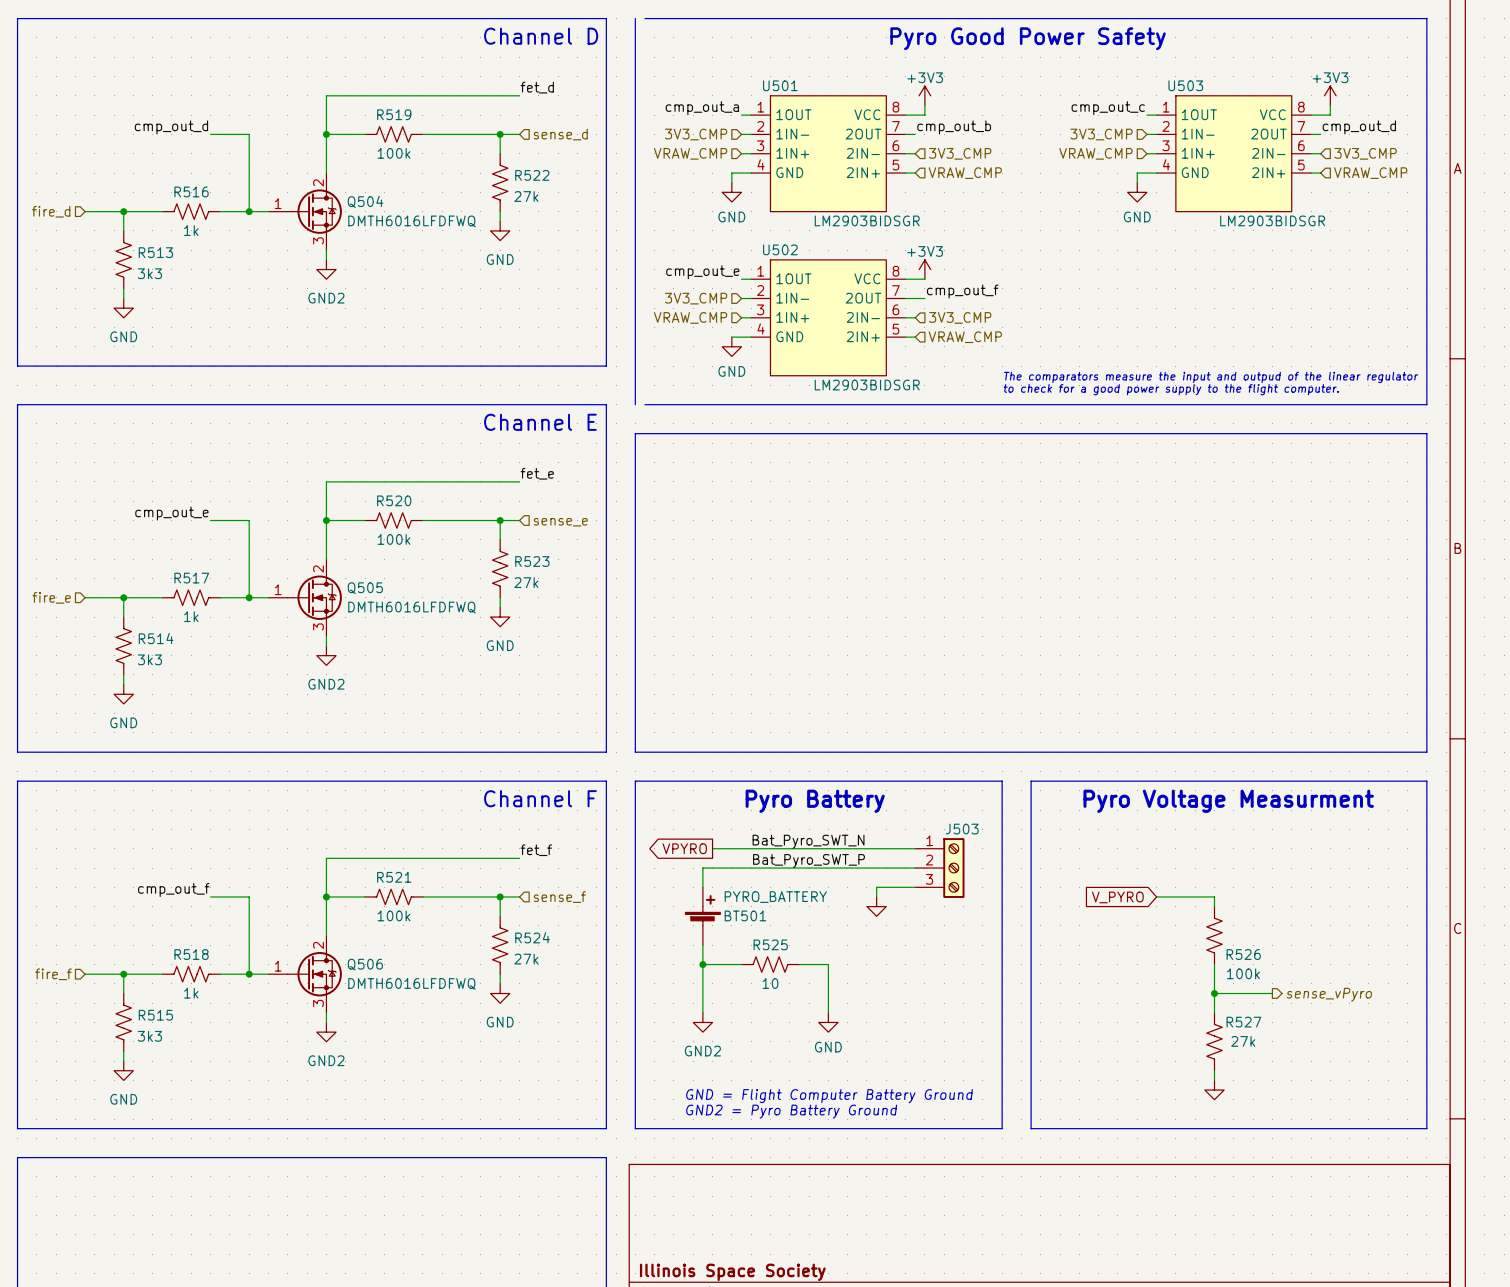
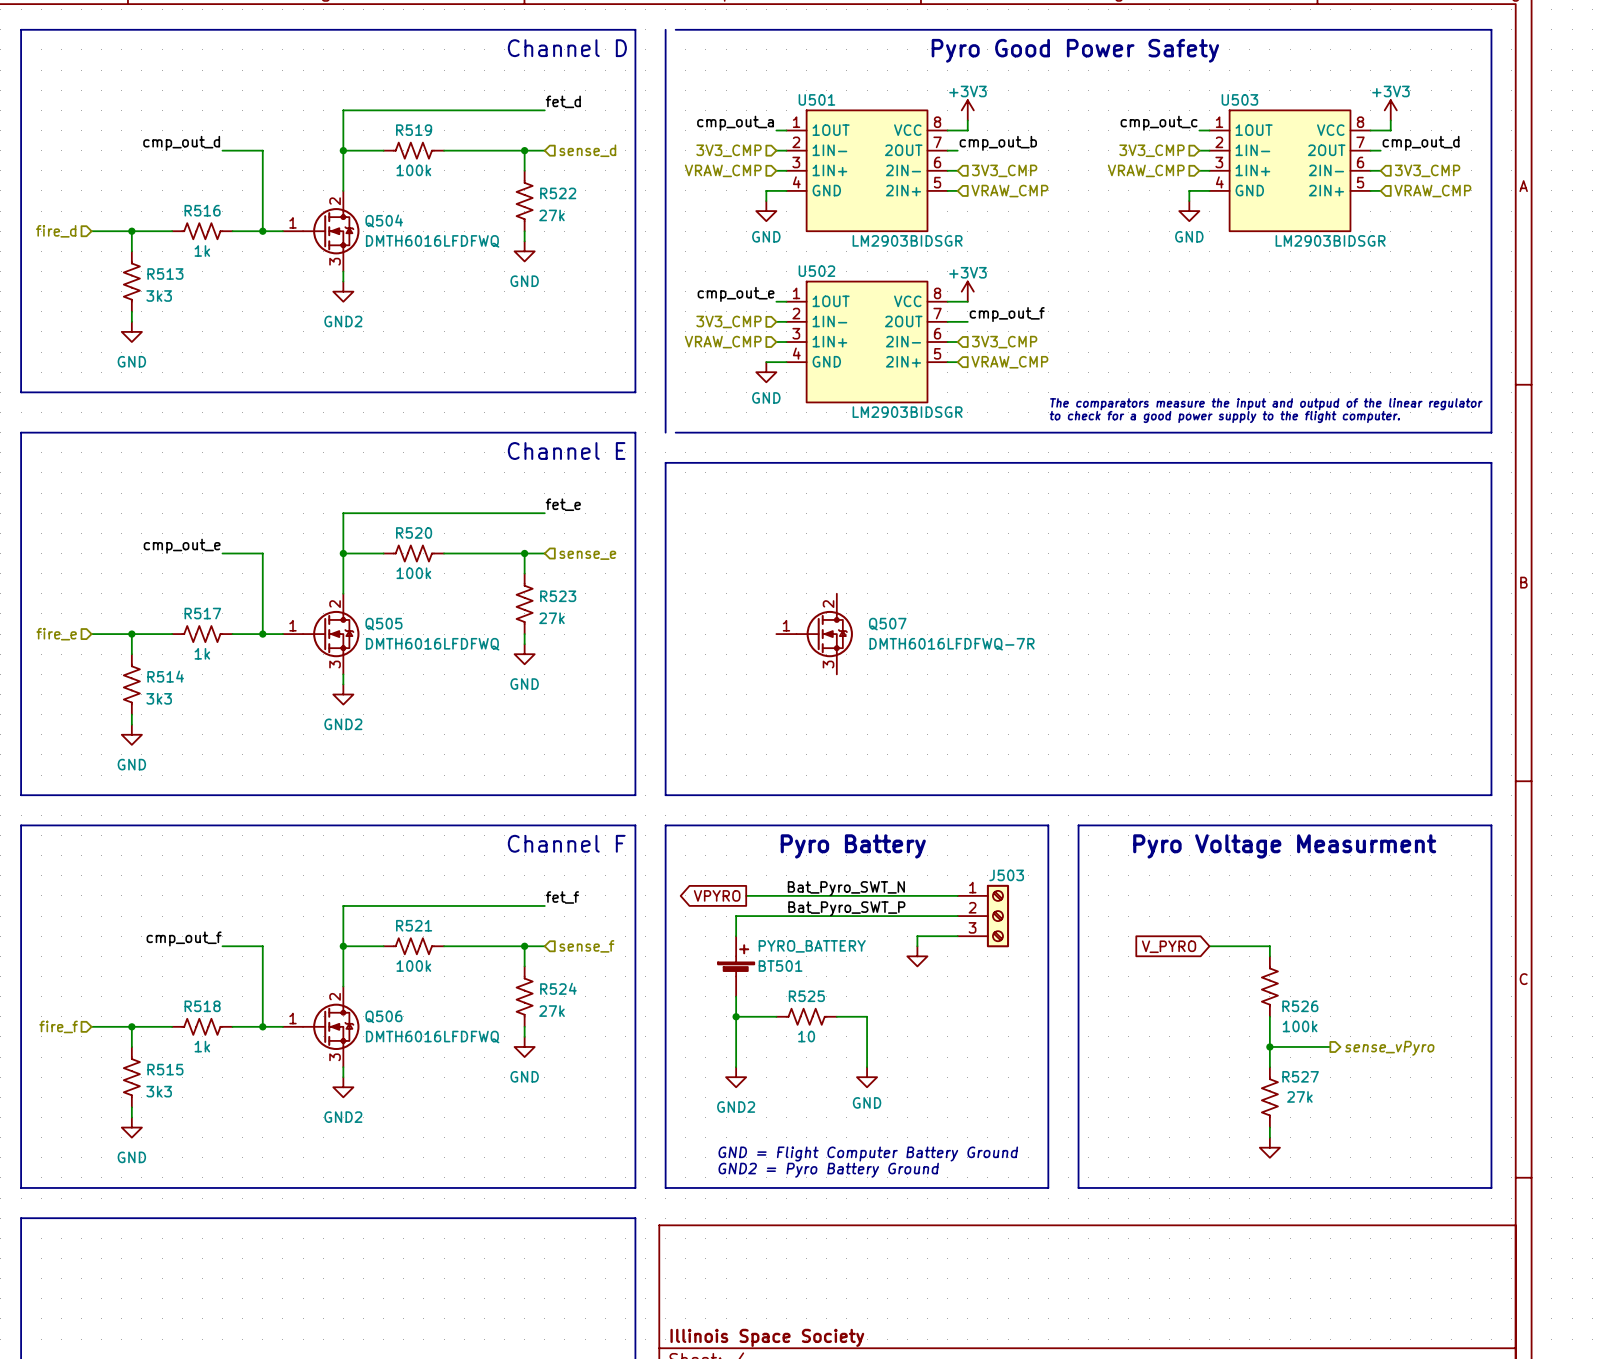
Q507: none -> DMTH6016LFDFWQ-7R (814, 634)

